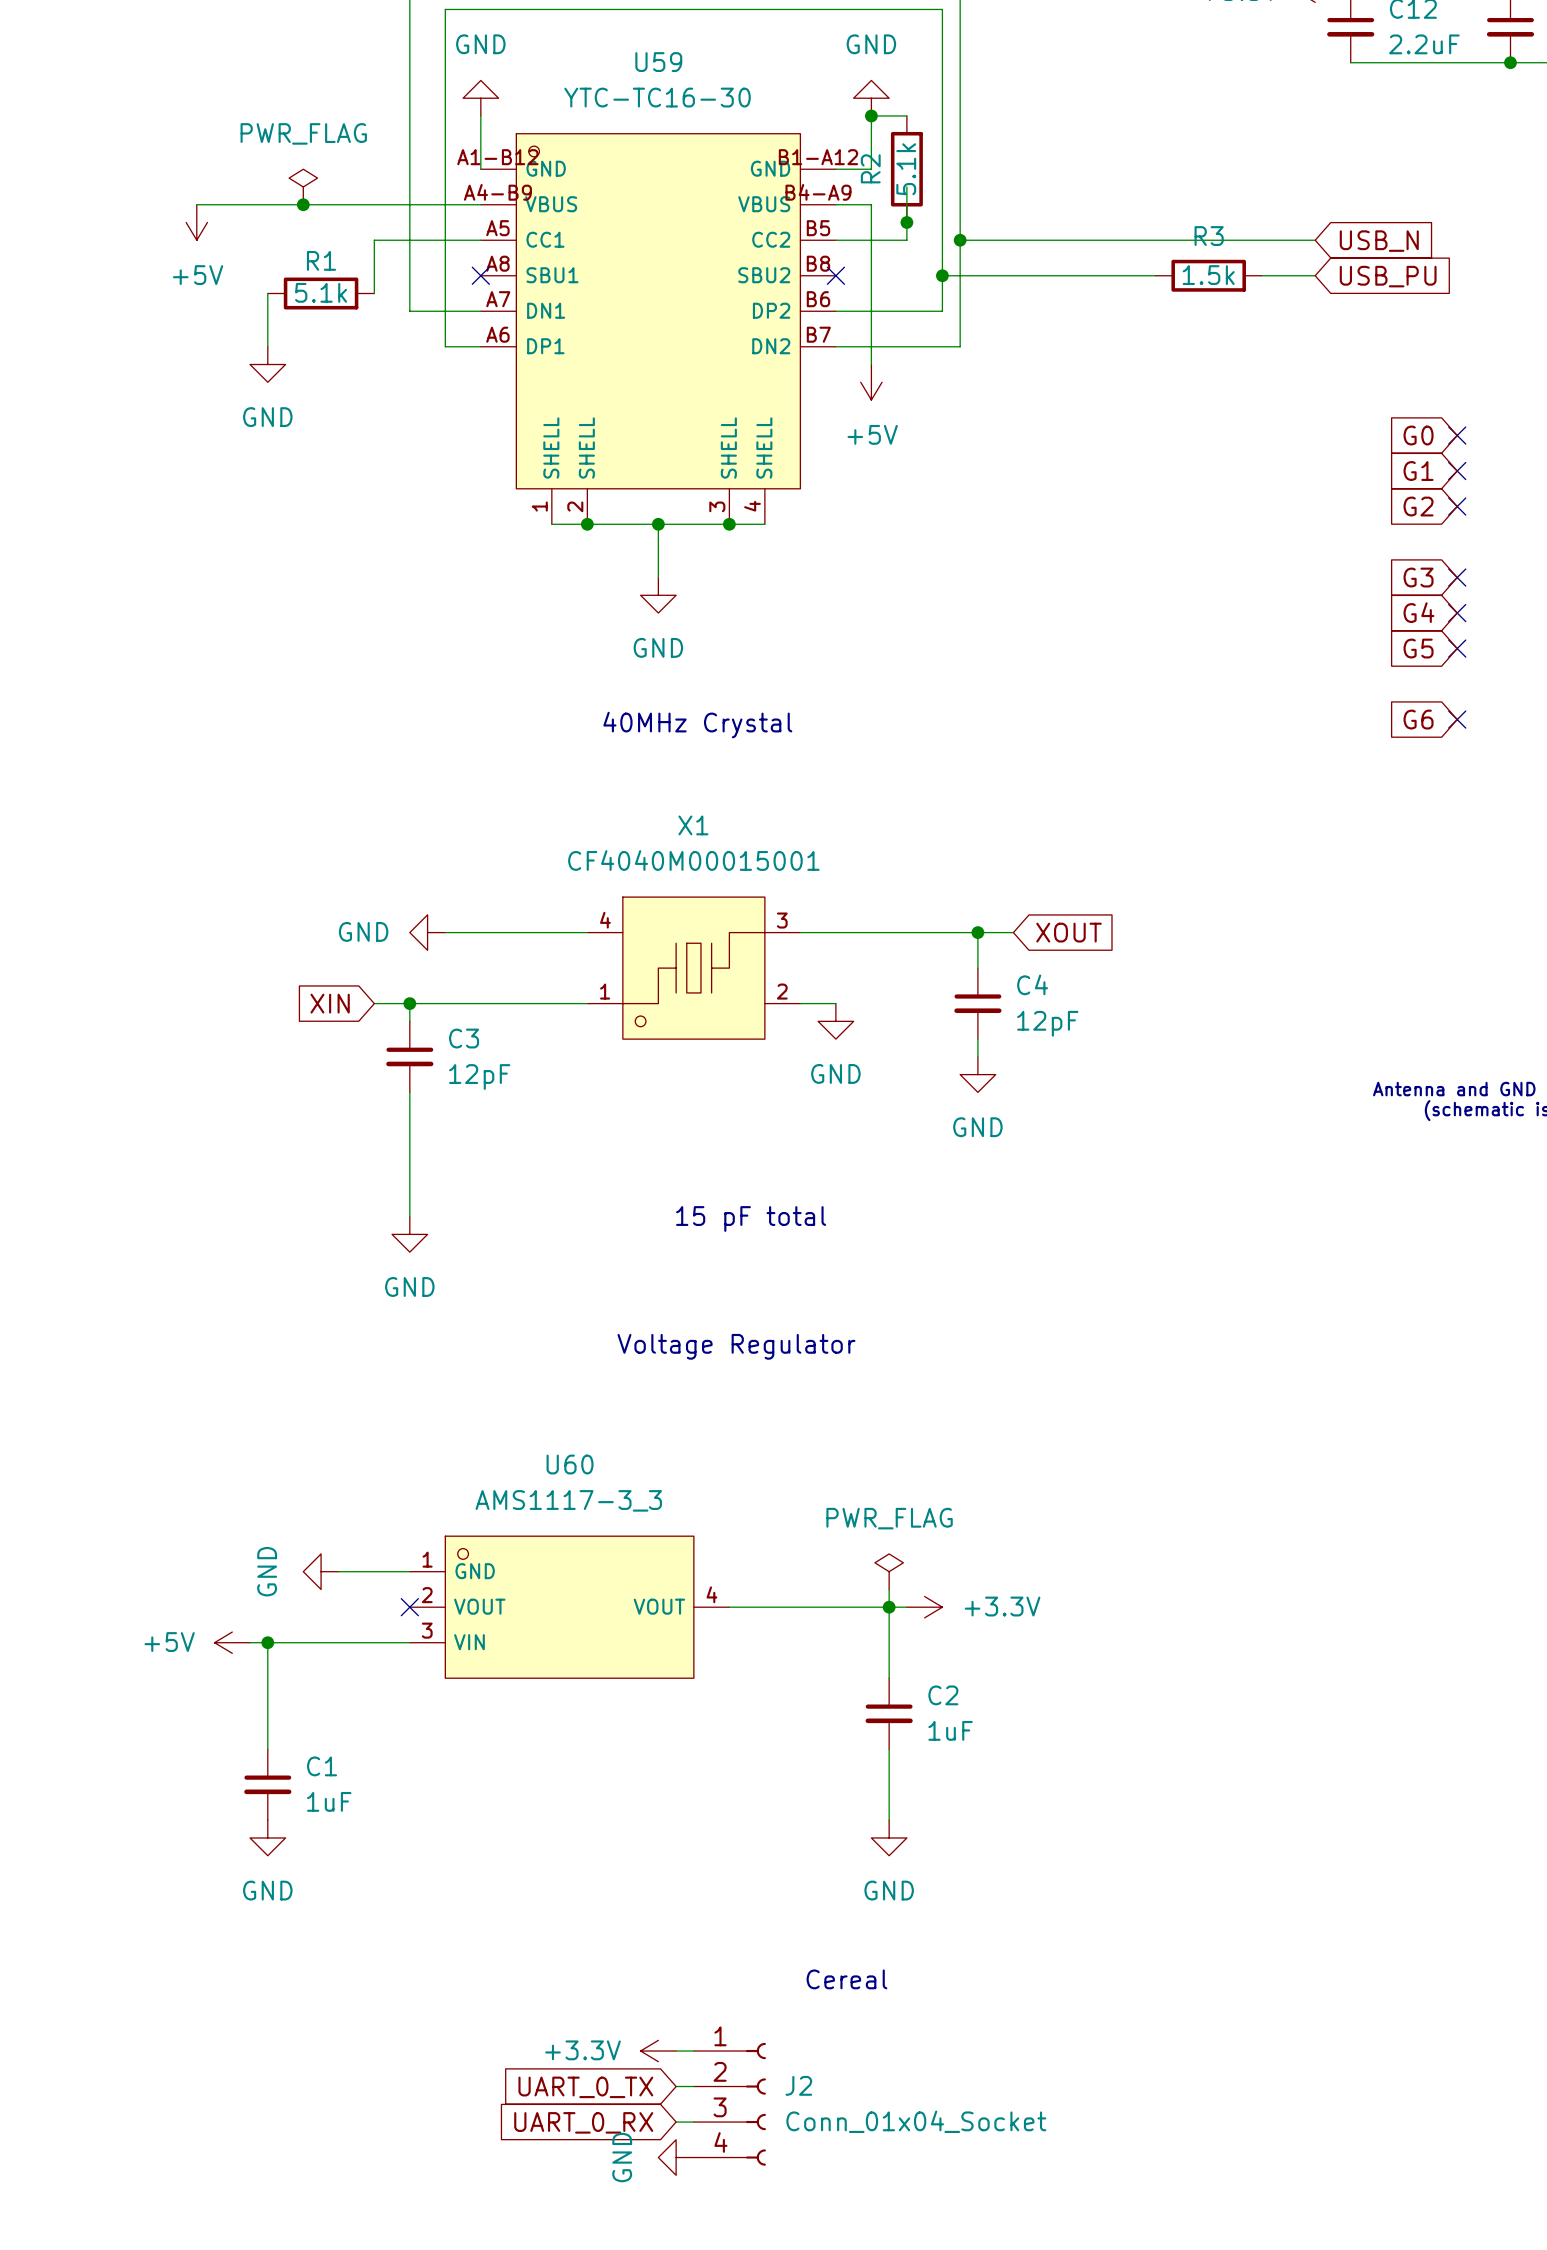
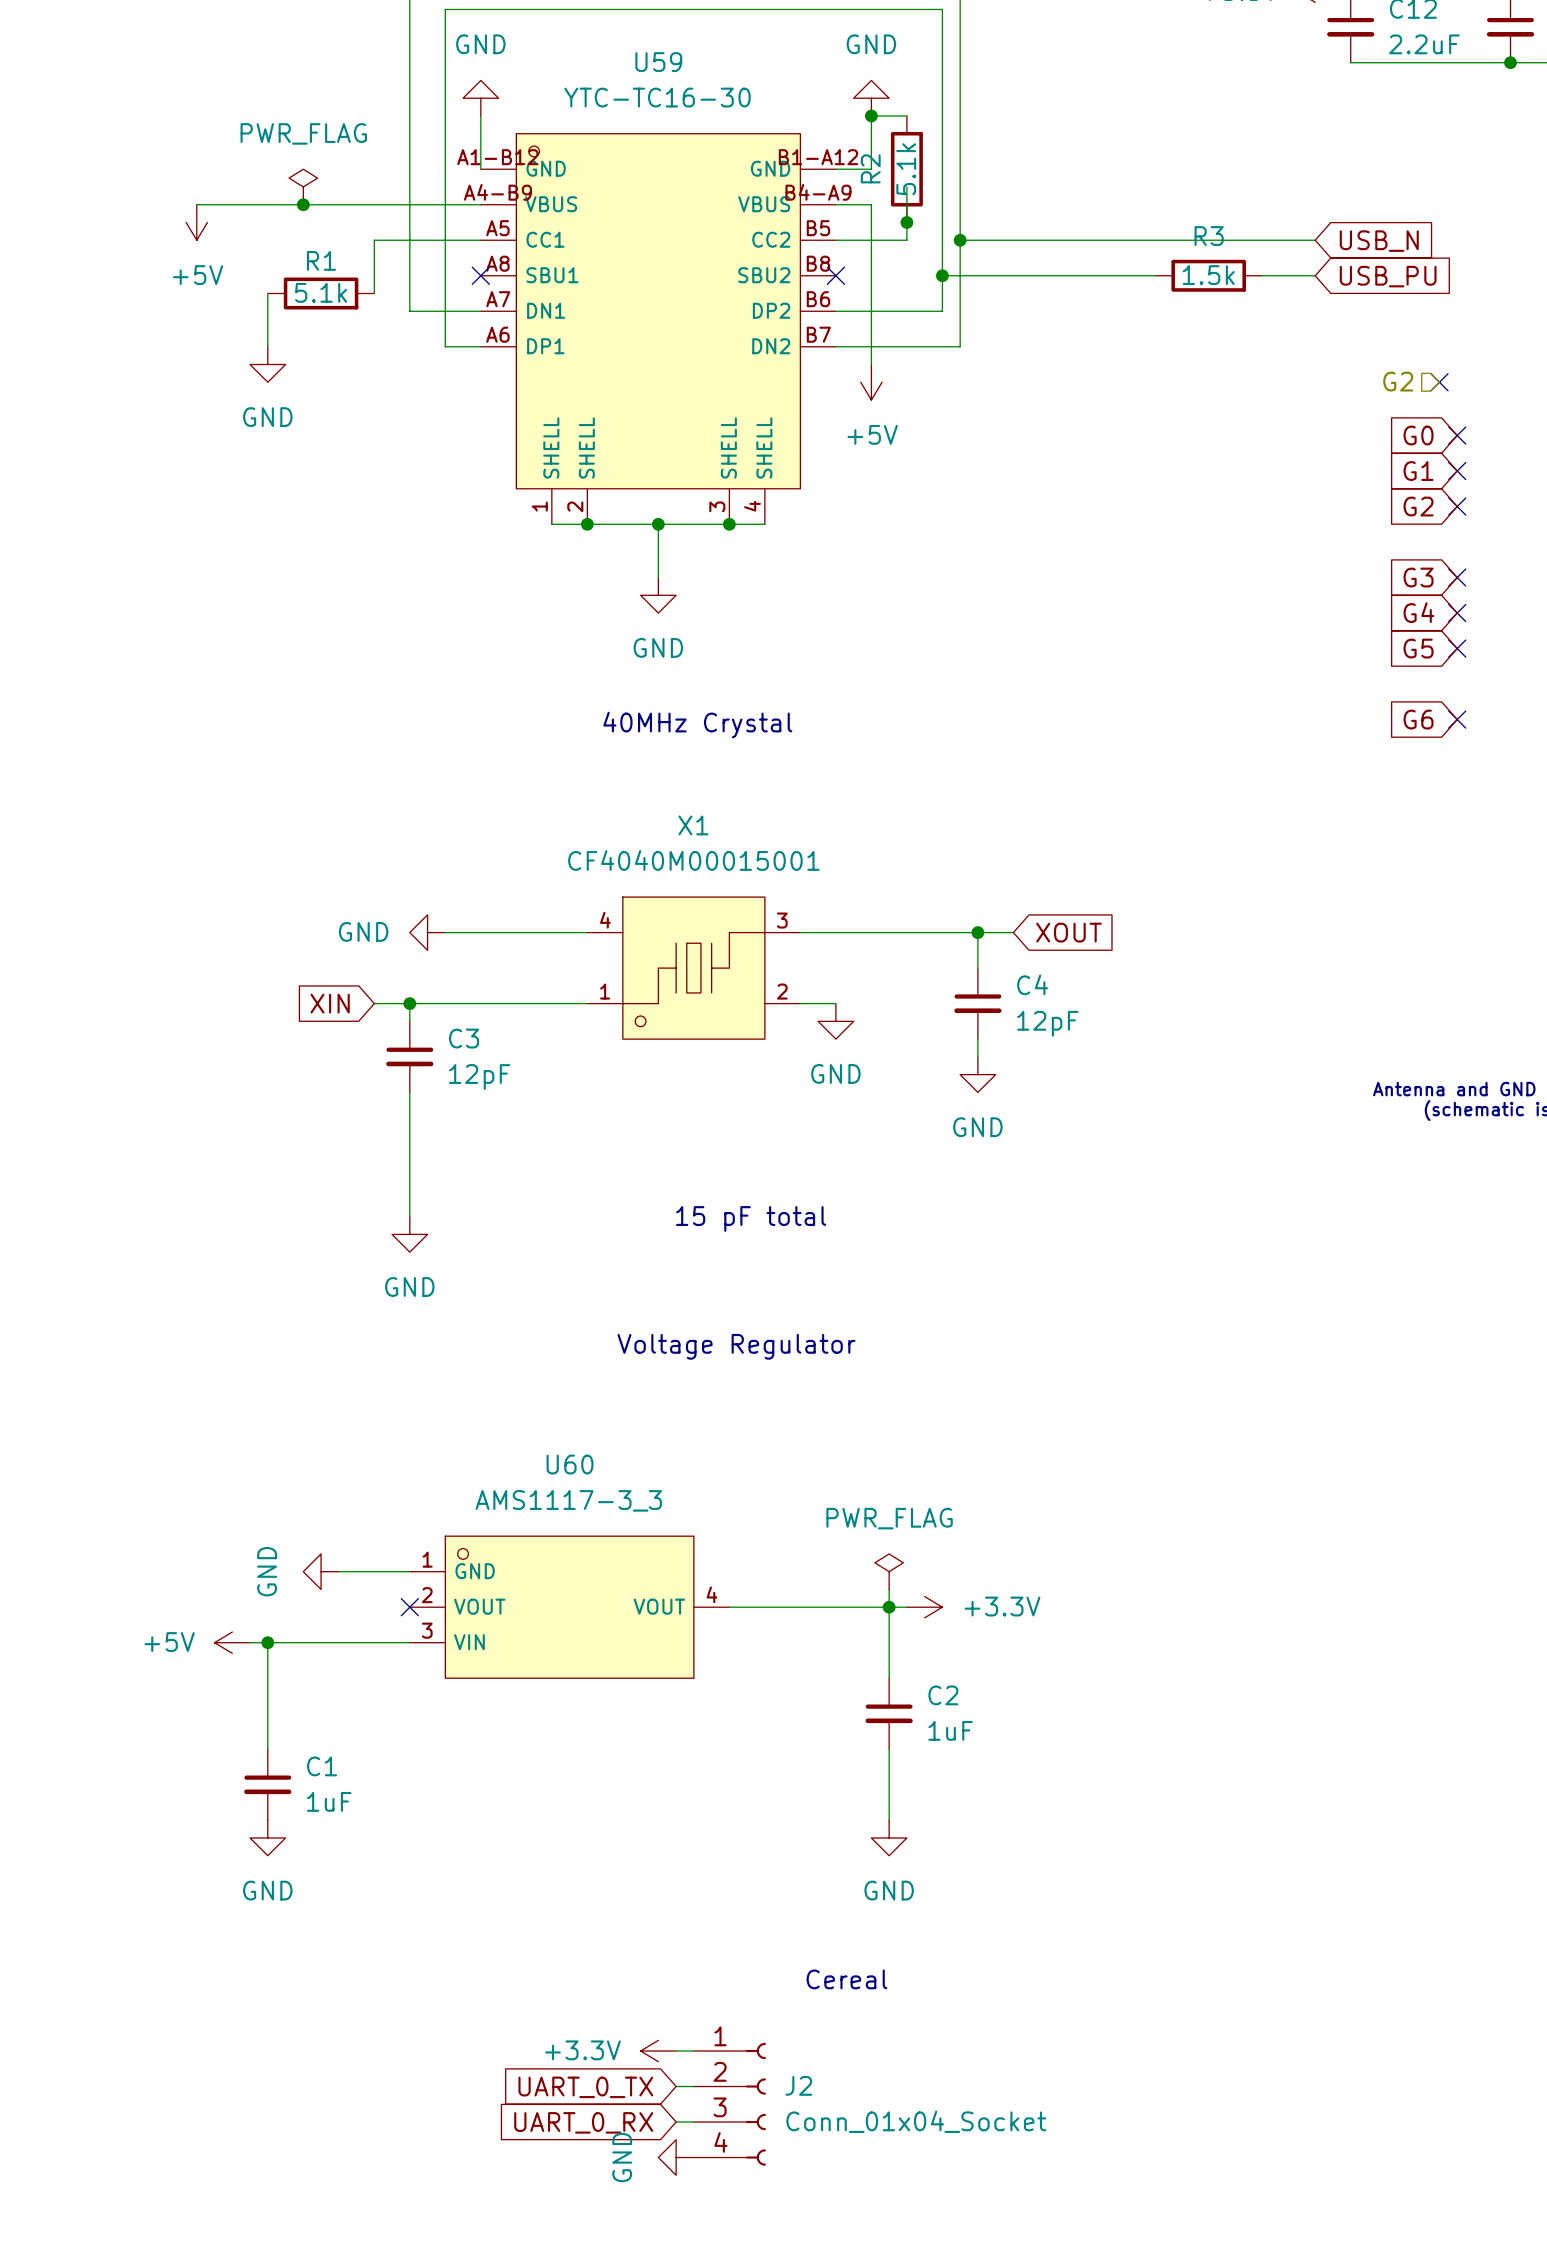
hierarchical label: none -> G2 (1398, 381)
no-connect mark: none -> (1439, 382)

